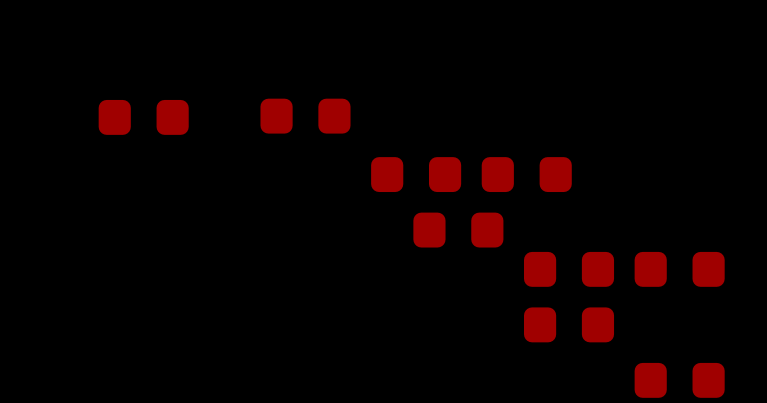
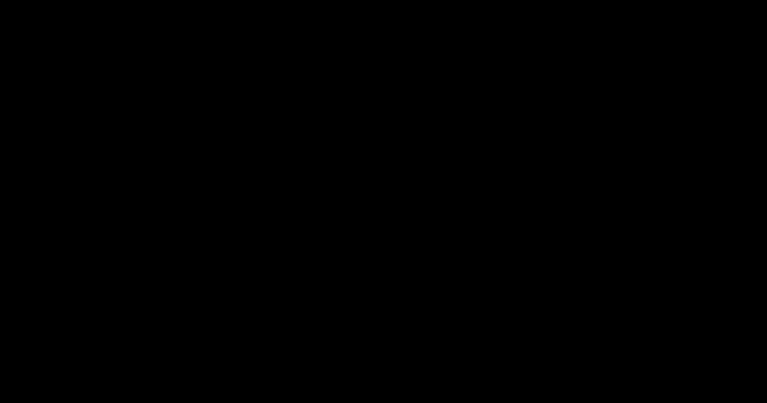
part: (305, 116) -> none
part: (143, 117) -> none
part: (416, 174) -> none
part: (526, 174) -> none
part: (458, 230) -> none
part: (569, 269) -> none
part: (679, 269) -> none
part: (569, 324) -> none
part: (679, 380) -> none

